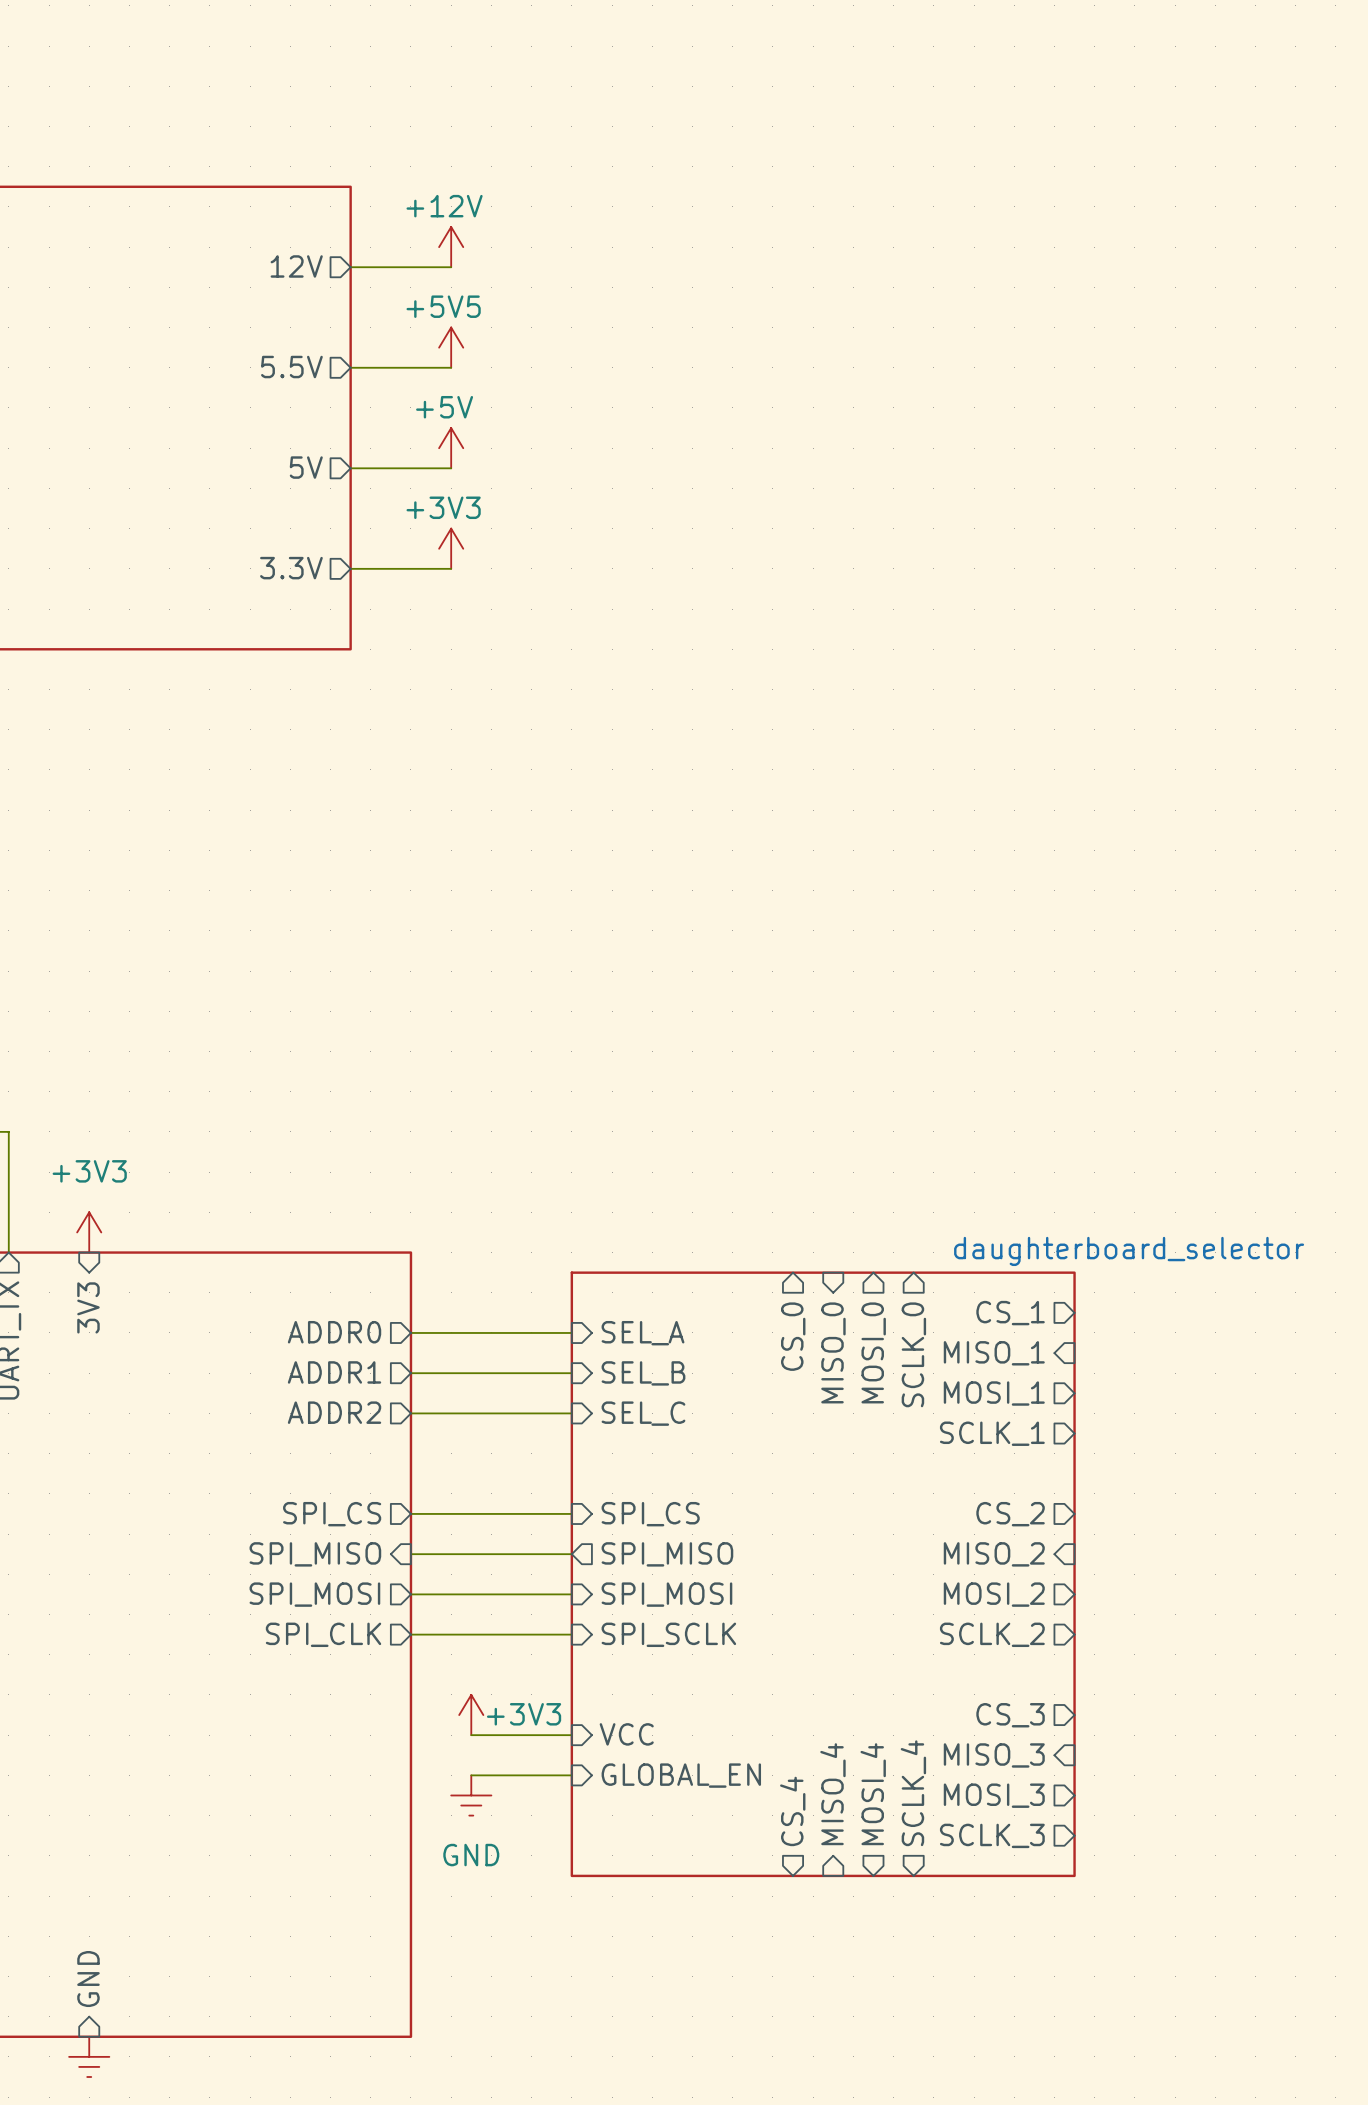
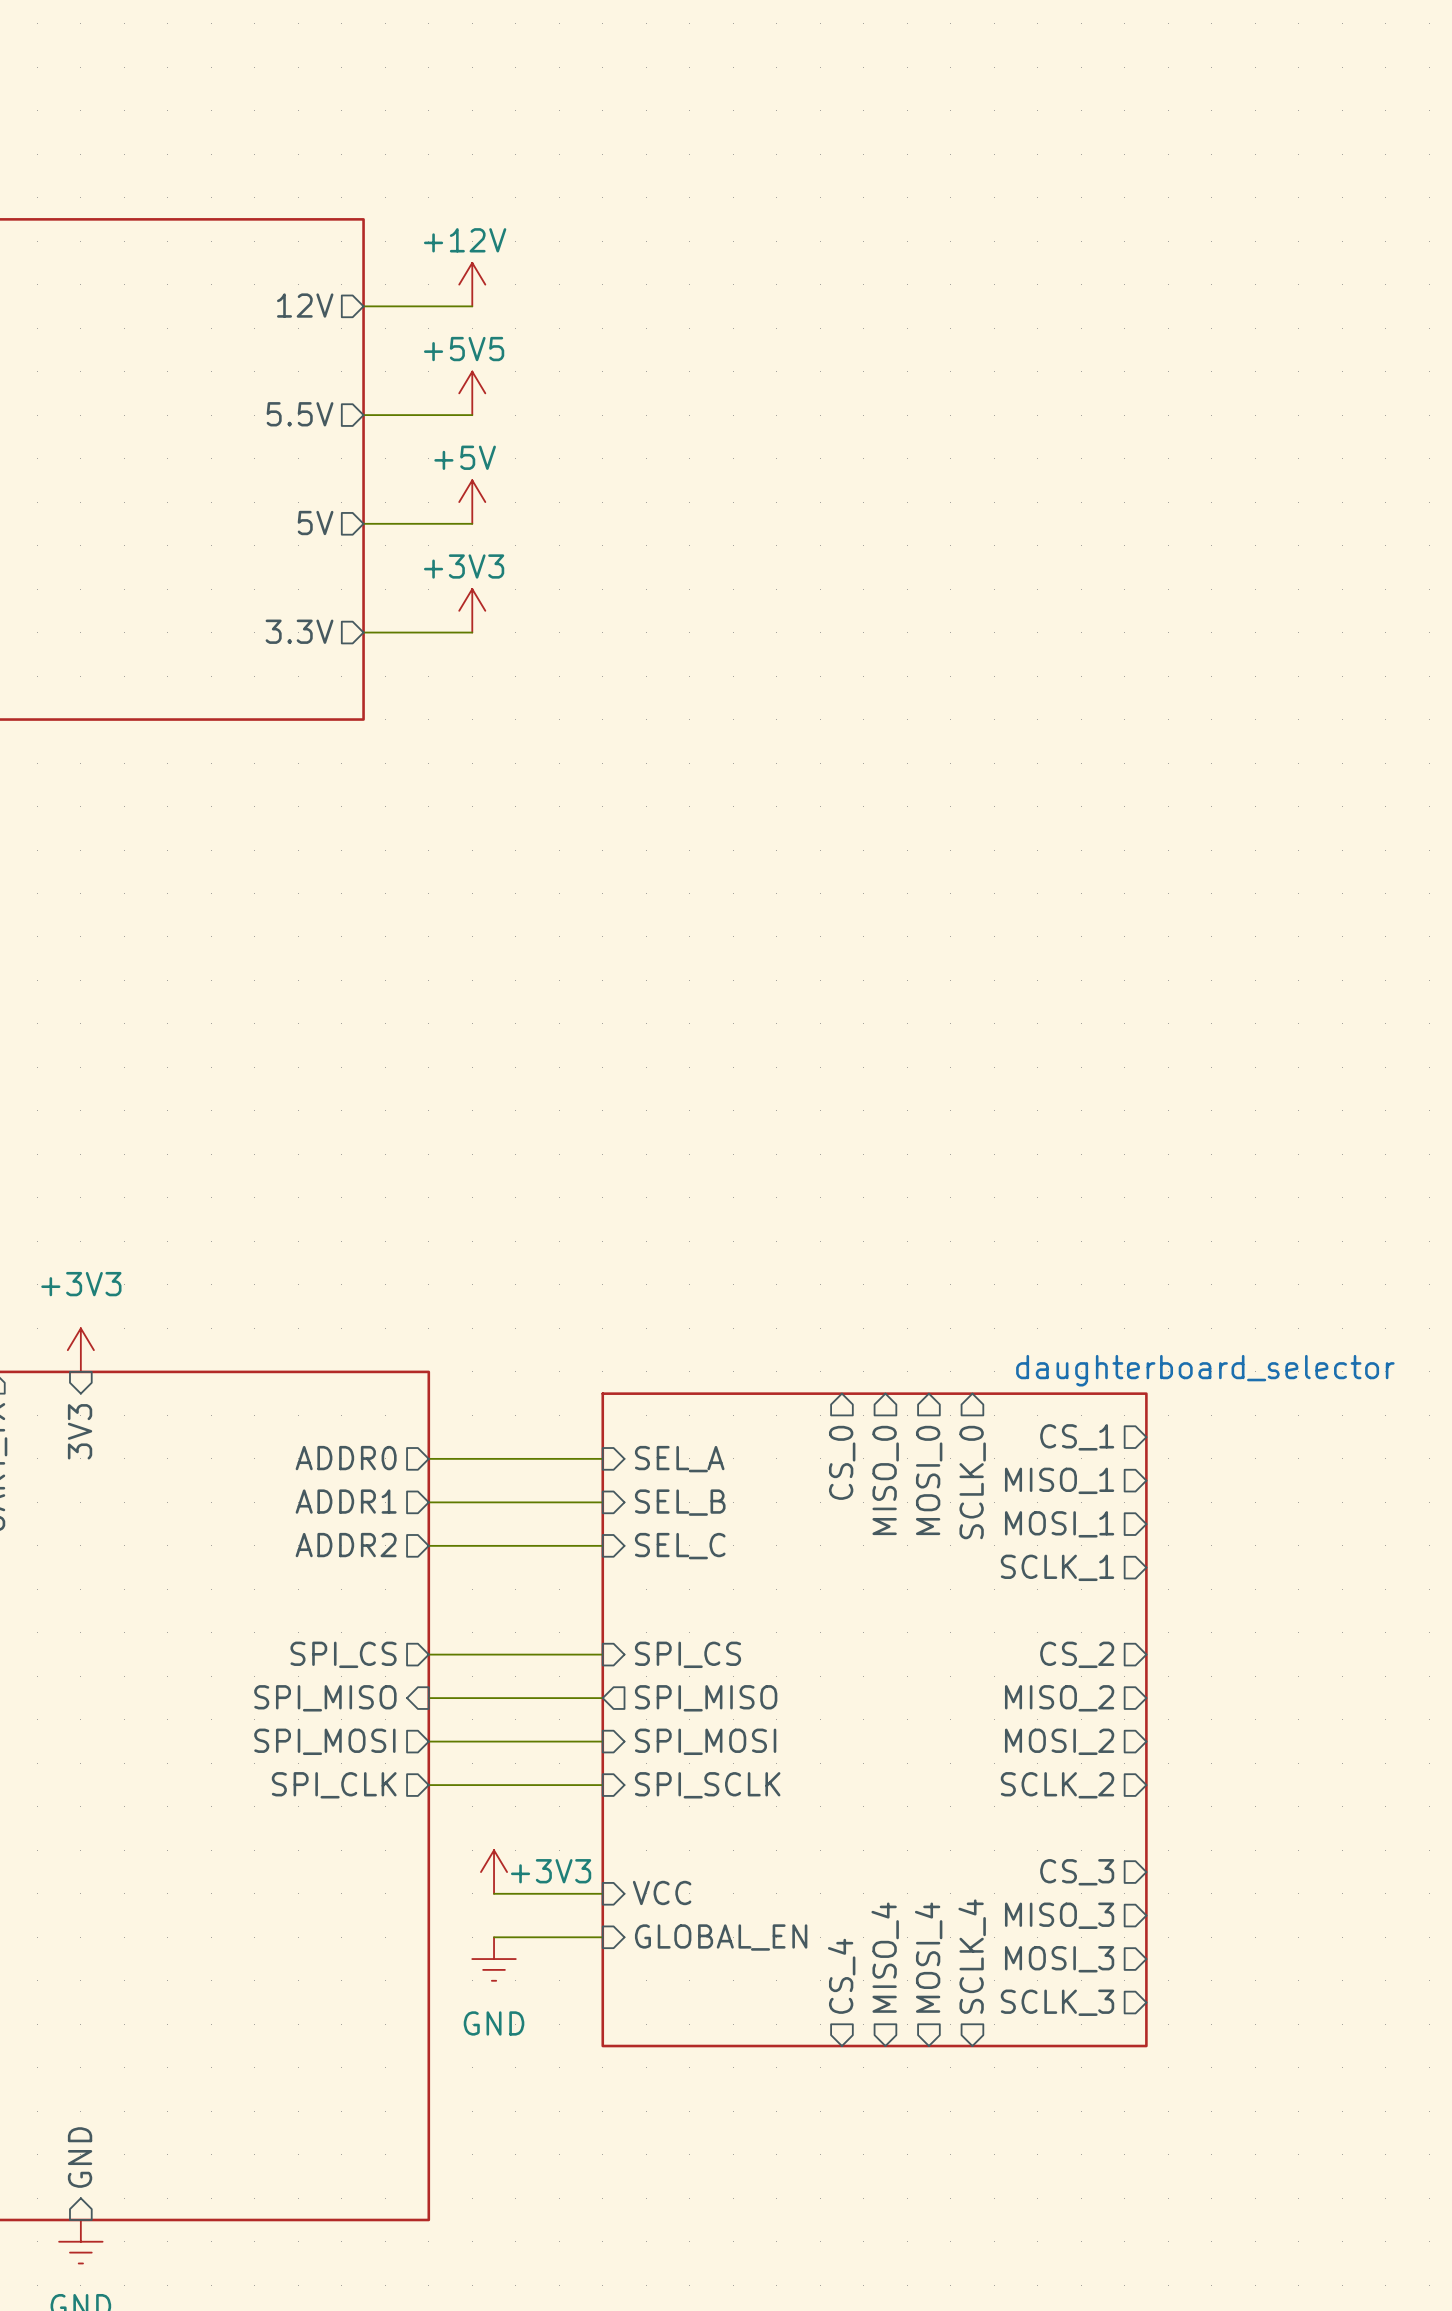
sheet pin shape: input (833, 1352) -> output (885, 1480)
sheet pin shape: input (994, 1353) -> output (1059, 1480)
sheet pin shape: input (994, 1554) -> output (1059, 1698)
sheet pin shape: input (994, 1755) -> output (1059, 1915)
sheet pin shape: input (832, 1794) -> output (885, 1957)

